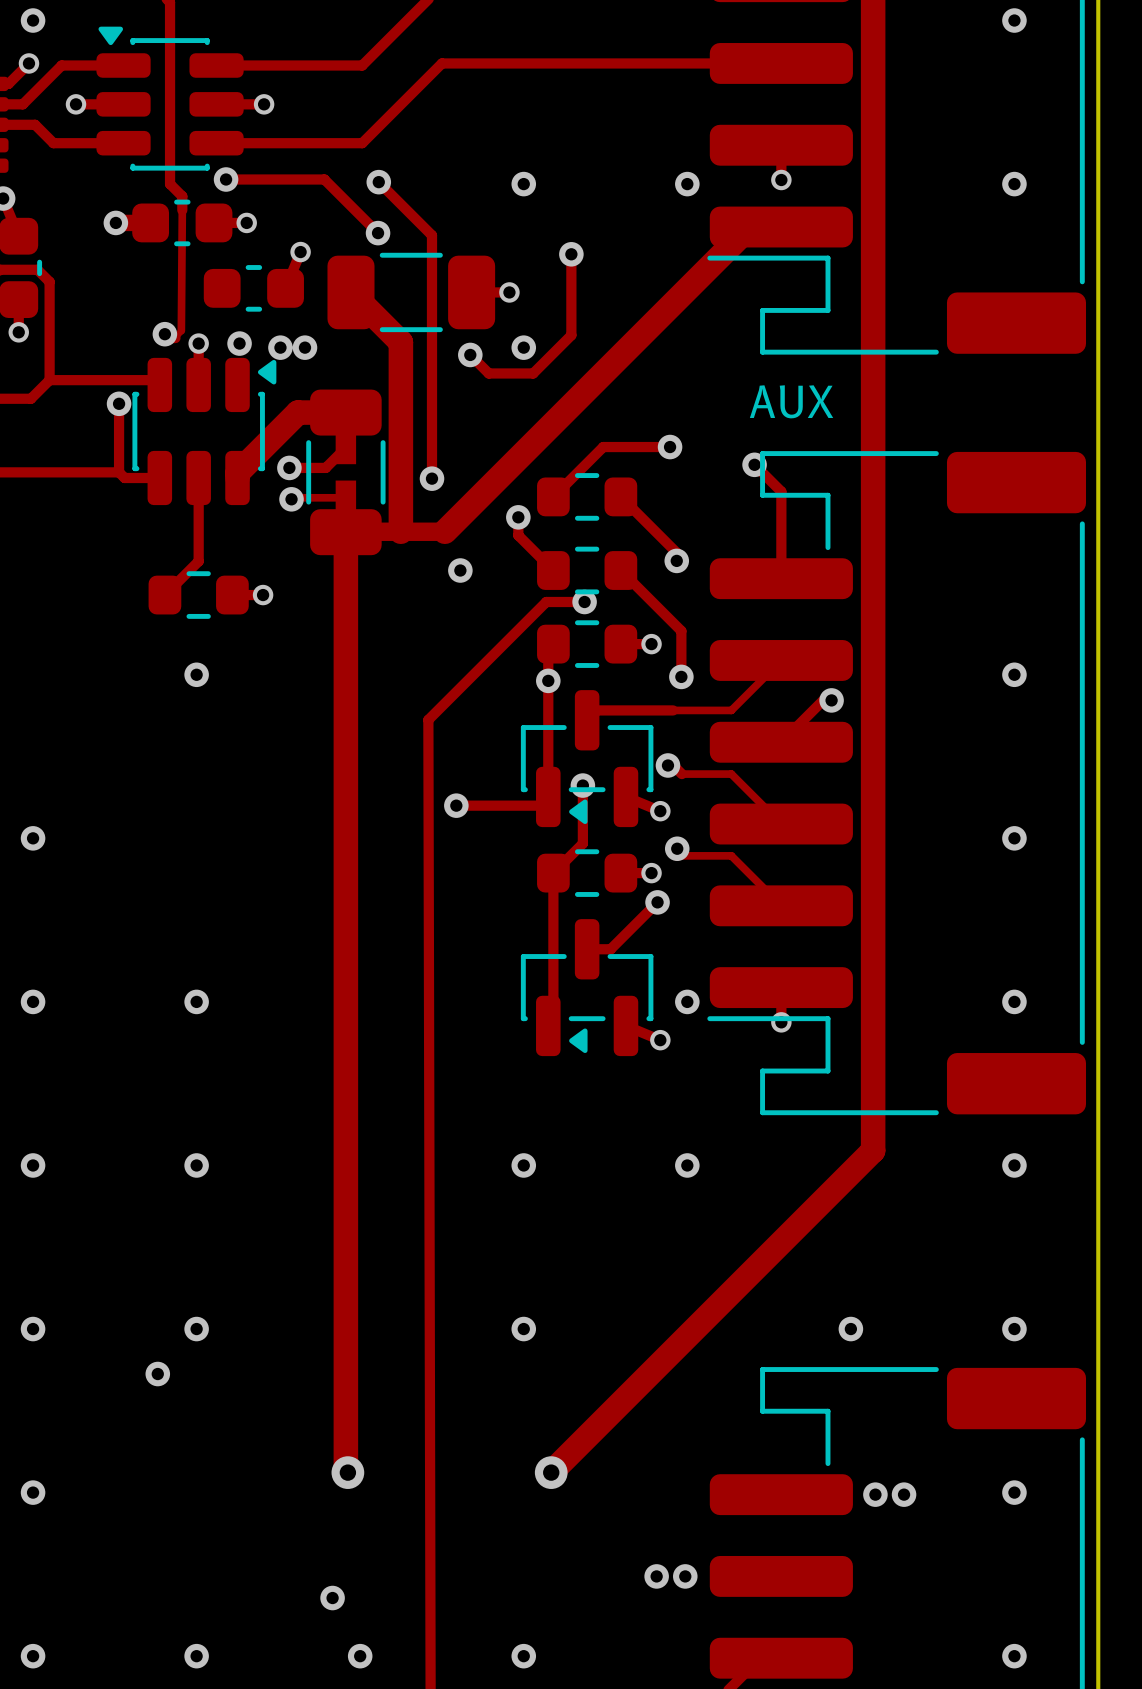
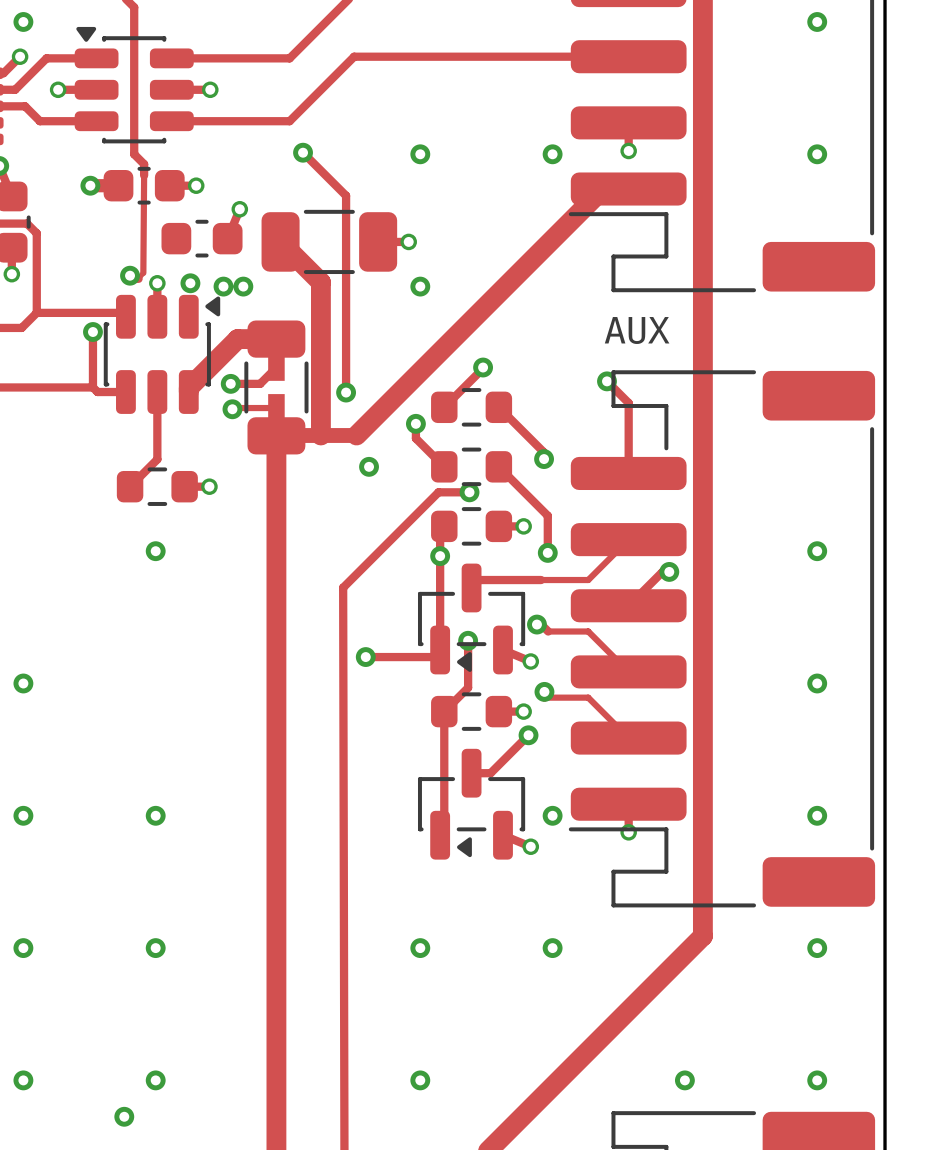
track: (226, 179) (324, 179) (378, 233) -> none
via: (226, 179) -> none
via: (378, 233) -> none
track: (571, 254) (571, 335) (533, 373) (488, 373) (470, 354) -> none
via: (571, 254) -> none
via: (470, 354) -> none
track: (670, 447) (603, 447) (601, 448) -> none
via position: (670, 447) -> (483, 367)

